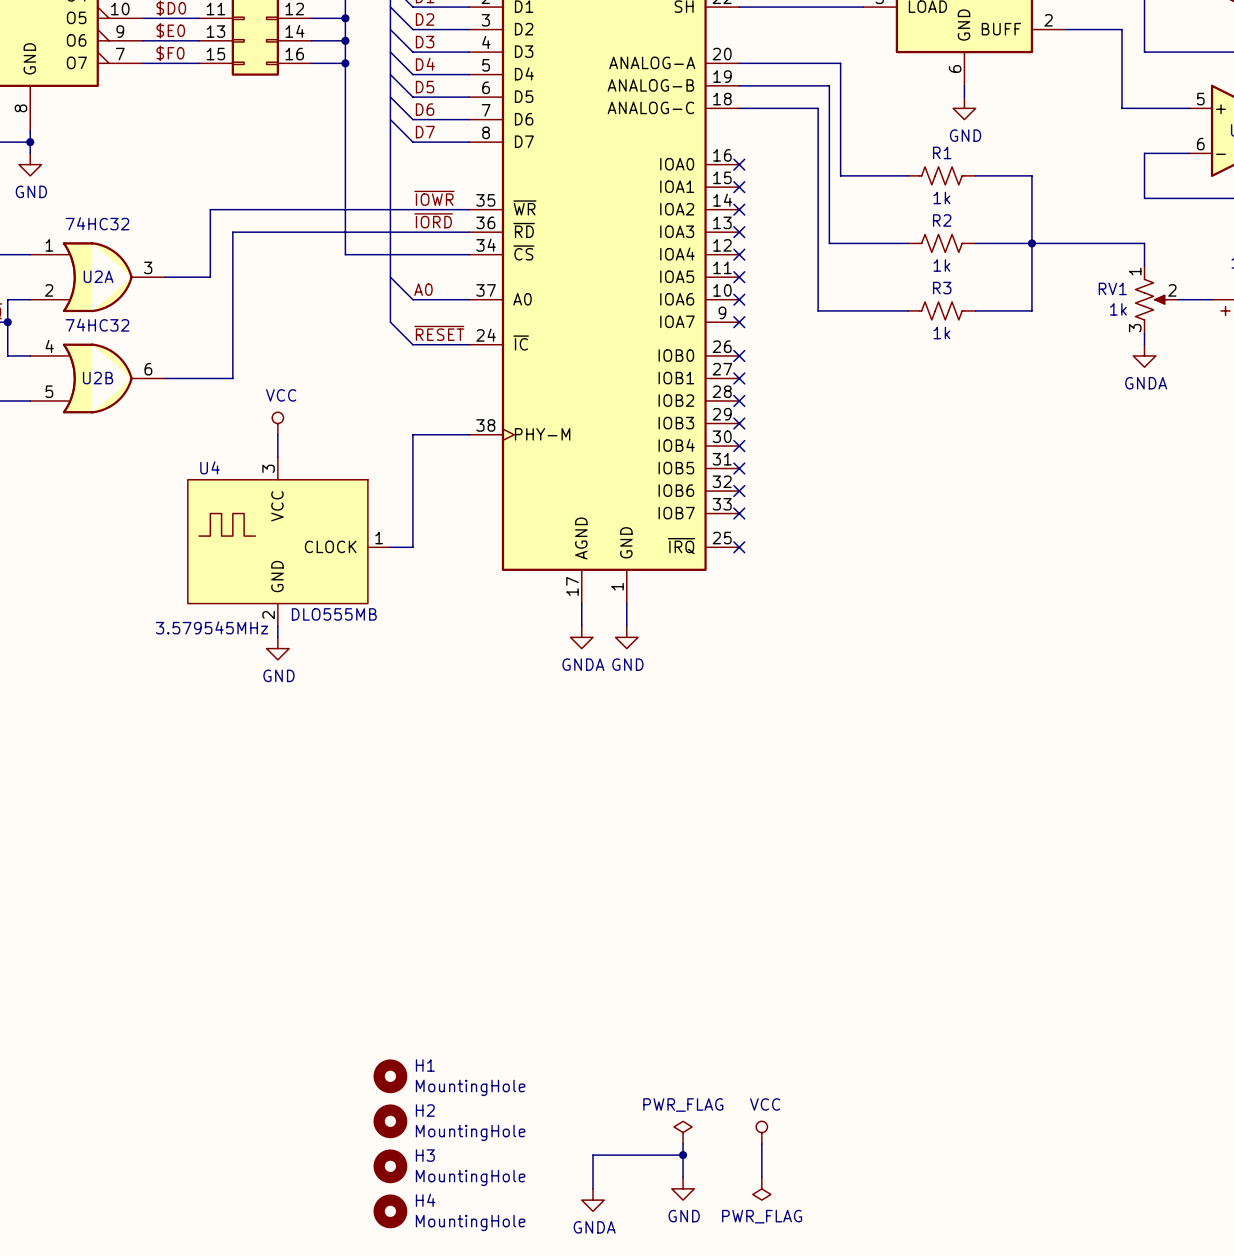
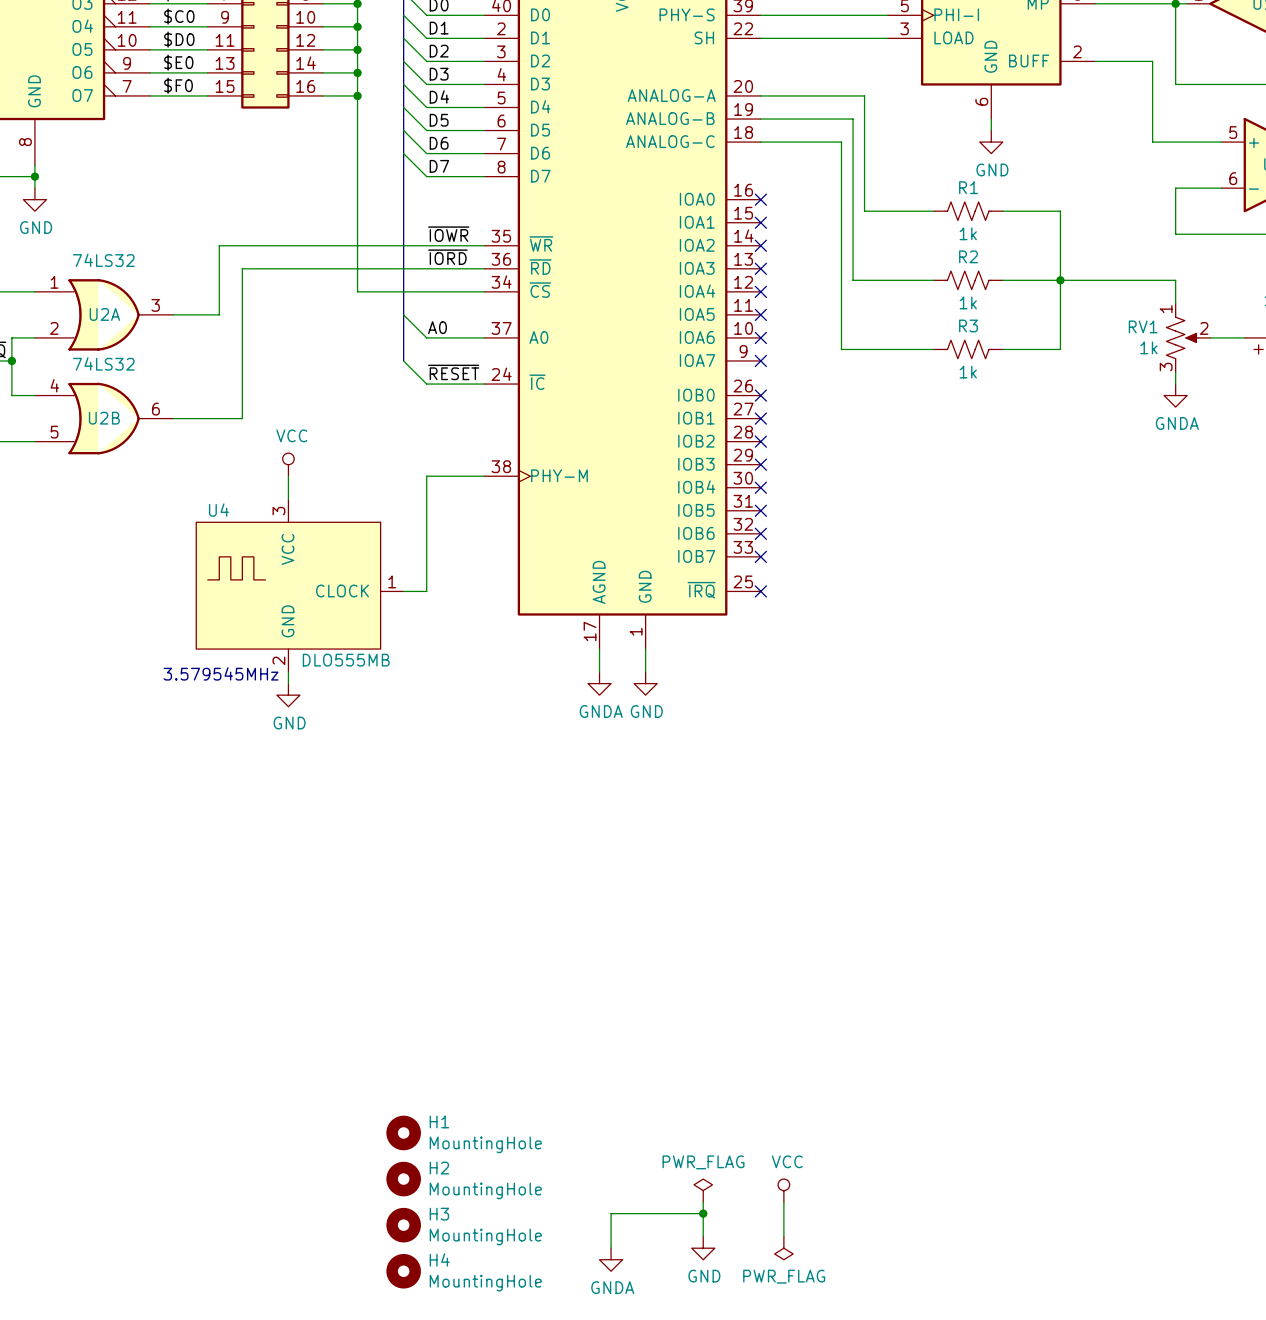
U2A value: 74HC32 (97, 223) -> 74LS32 (103, 260)
U2B value: 74HC32 (97, 325) -> 74LS32 (103, 363)

